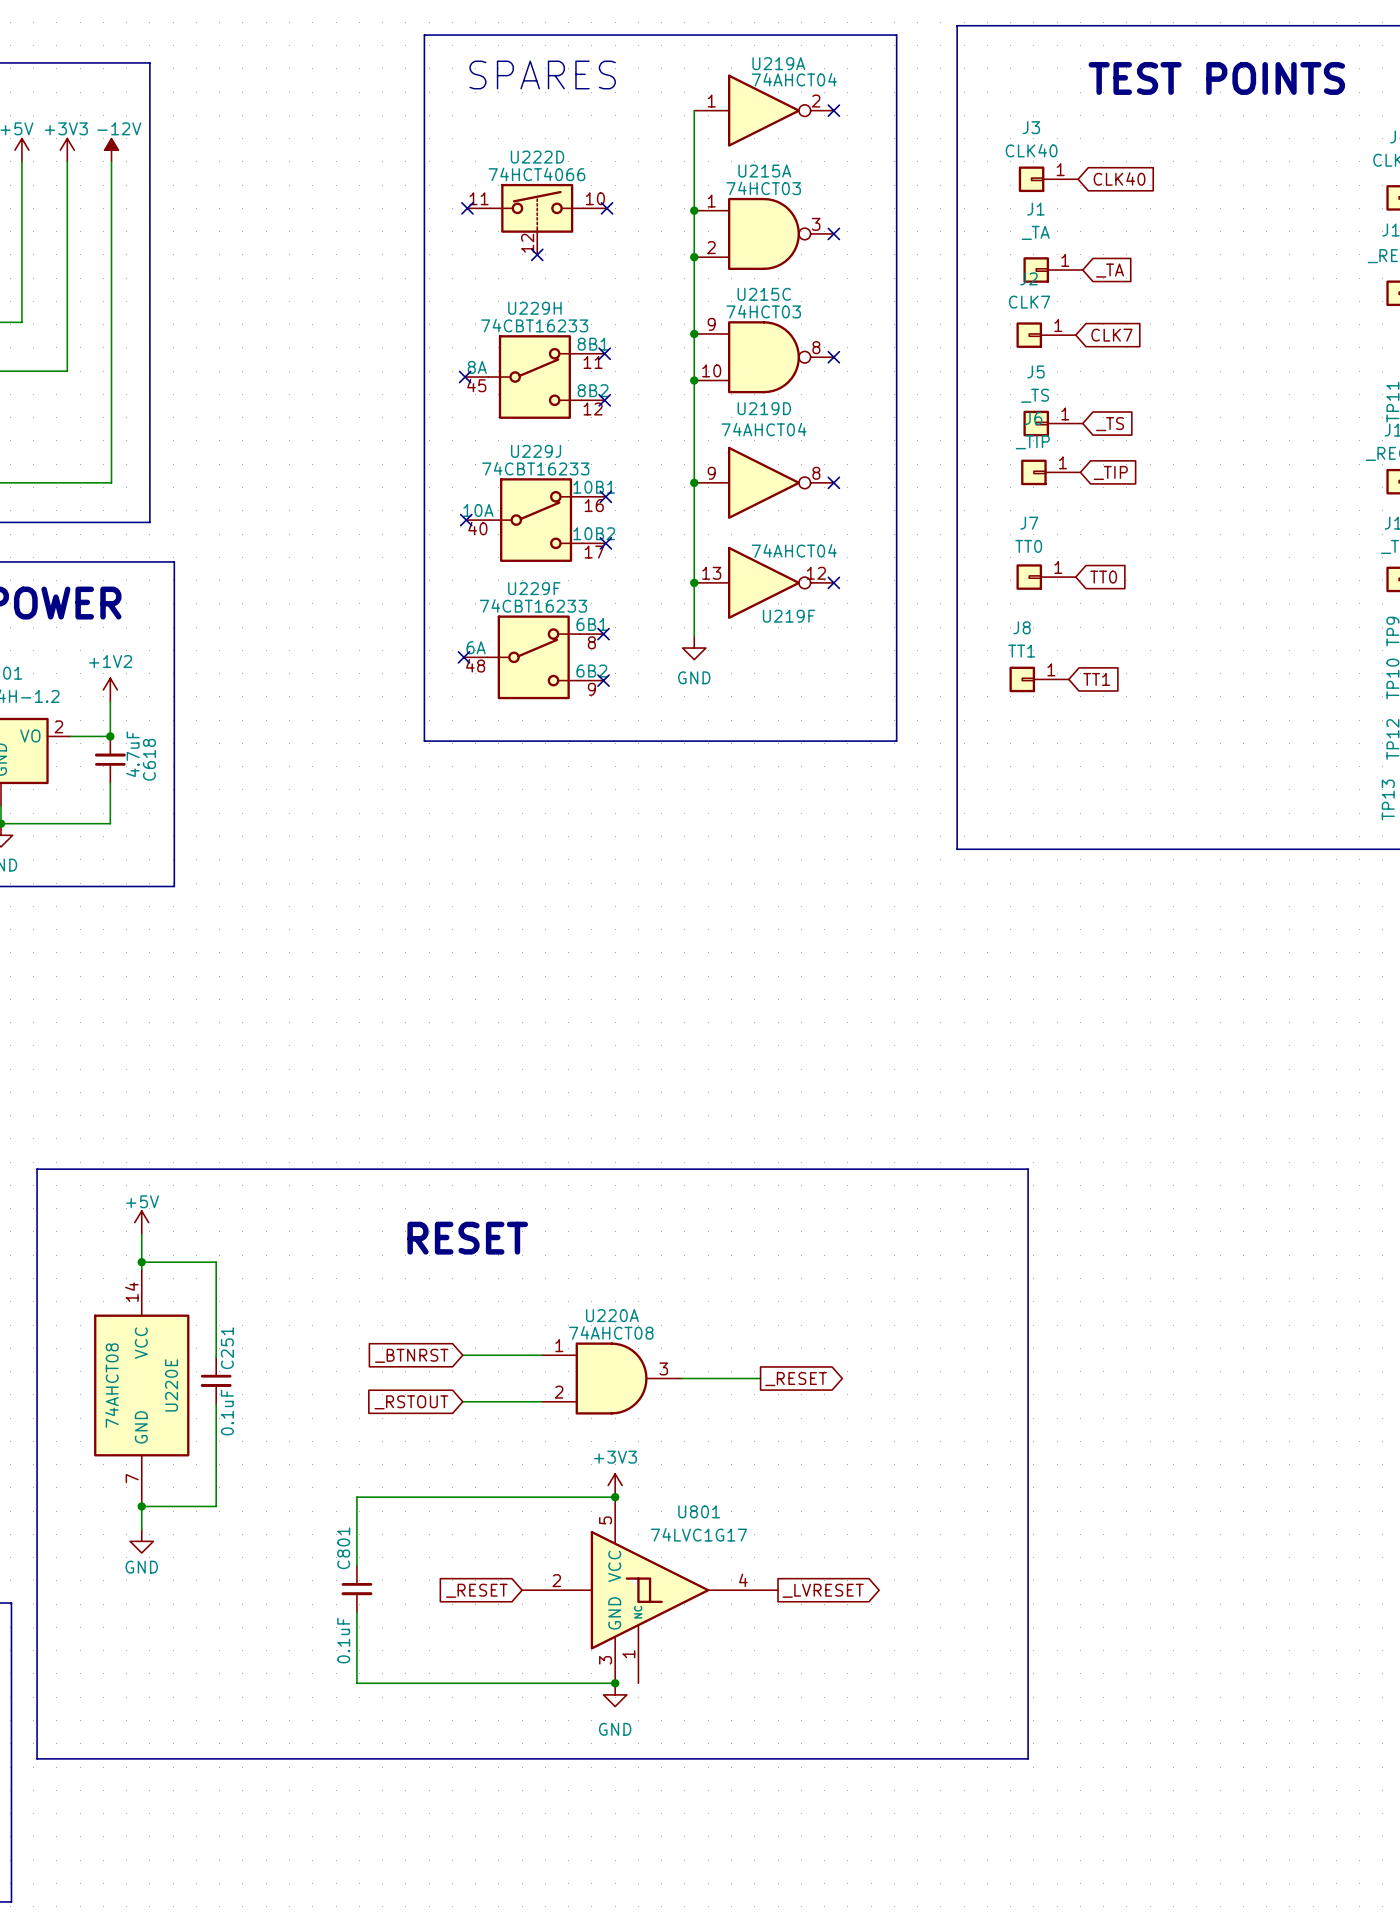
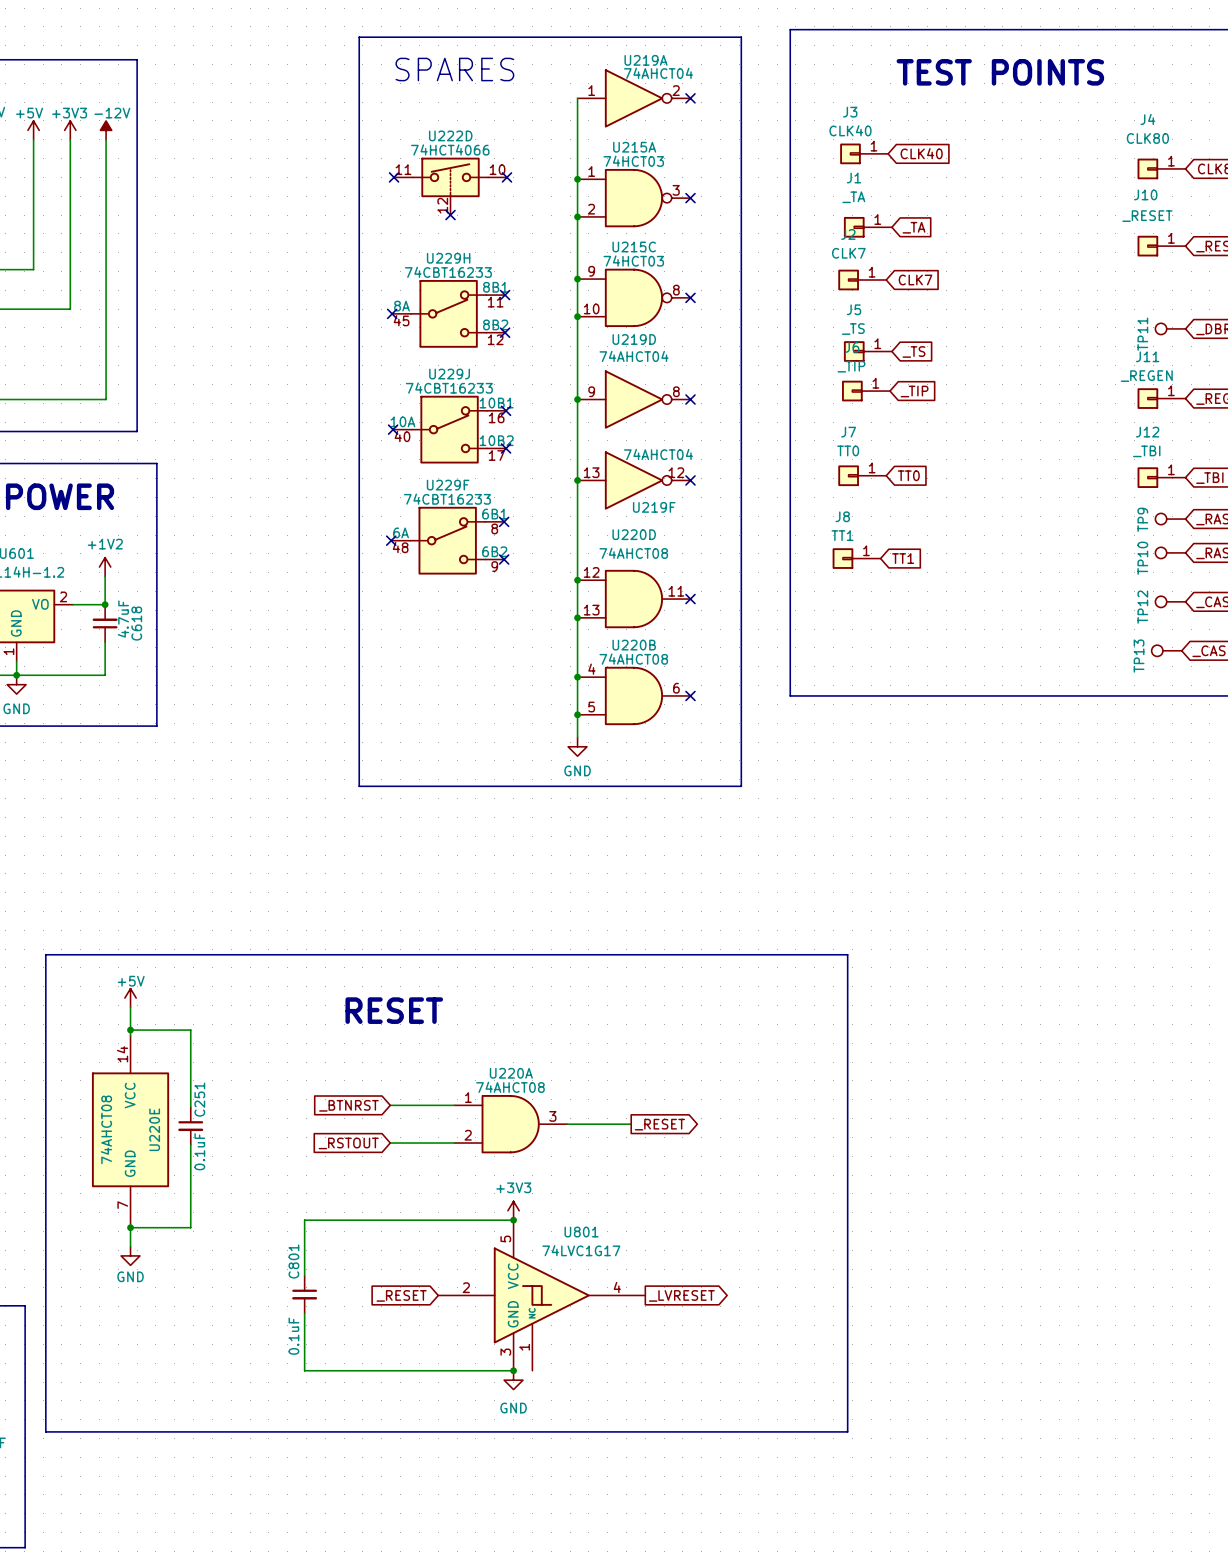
wire: none -> (577, 523) (577, 737)
power symbol: GND (694, 648) -> none
junction: none -> (577, 580)
U220D: none -> 74AHCT08 (634, 599)
no-connect mark: none -> (690, 599)
line: (424, 741) (896, 741) -> (359, 608) (359, 786) (741, 786) (741, 608)
junction: none -> (577, 617)
junction: none -> (577, 677)
U220B: none -> 74AHCT08 (634, 695)
no-connect mark: none -> (690, 695)
junction: none -> (577, 714)
power symbol: none -> GND (577, 746)

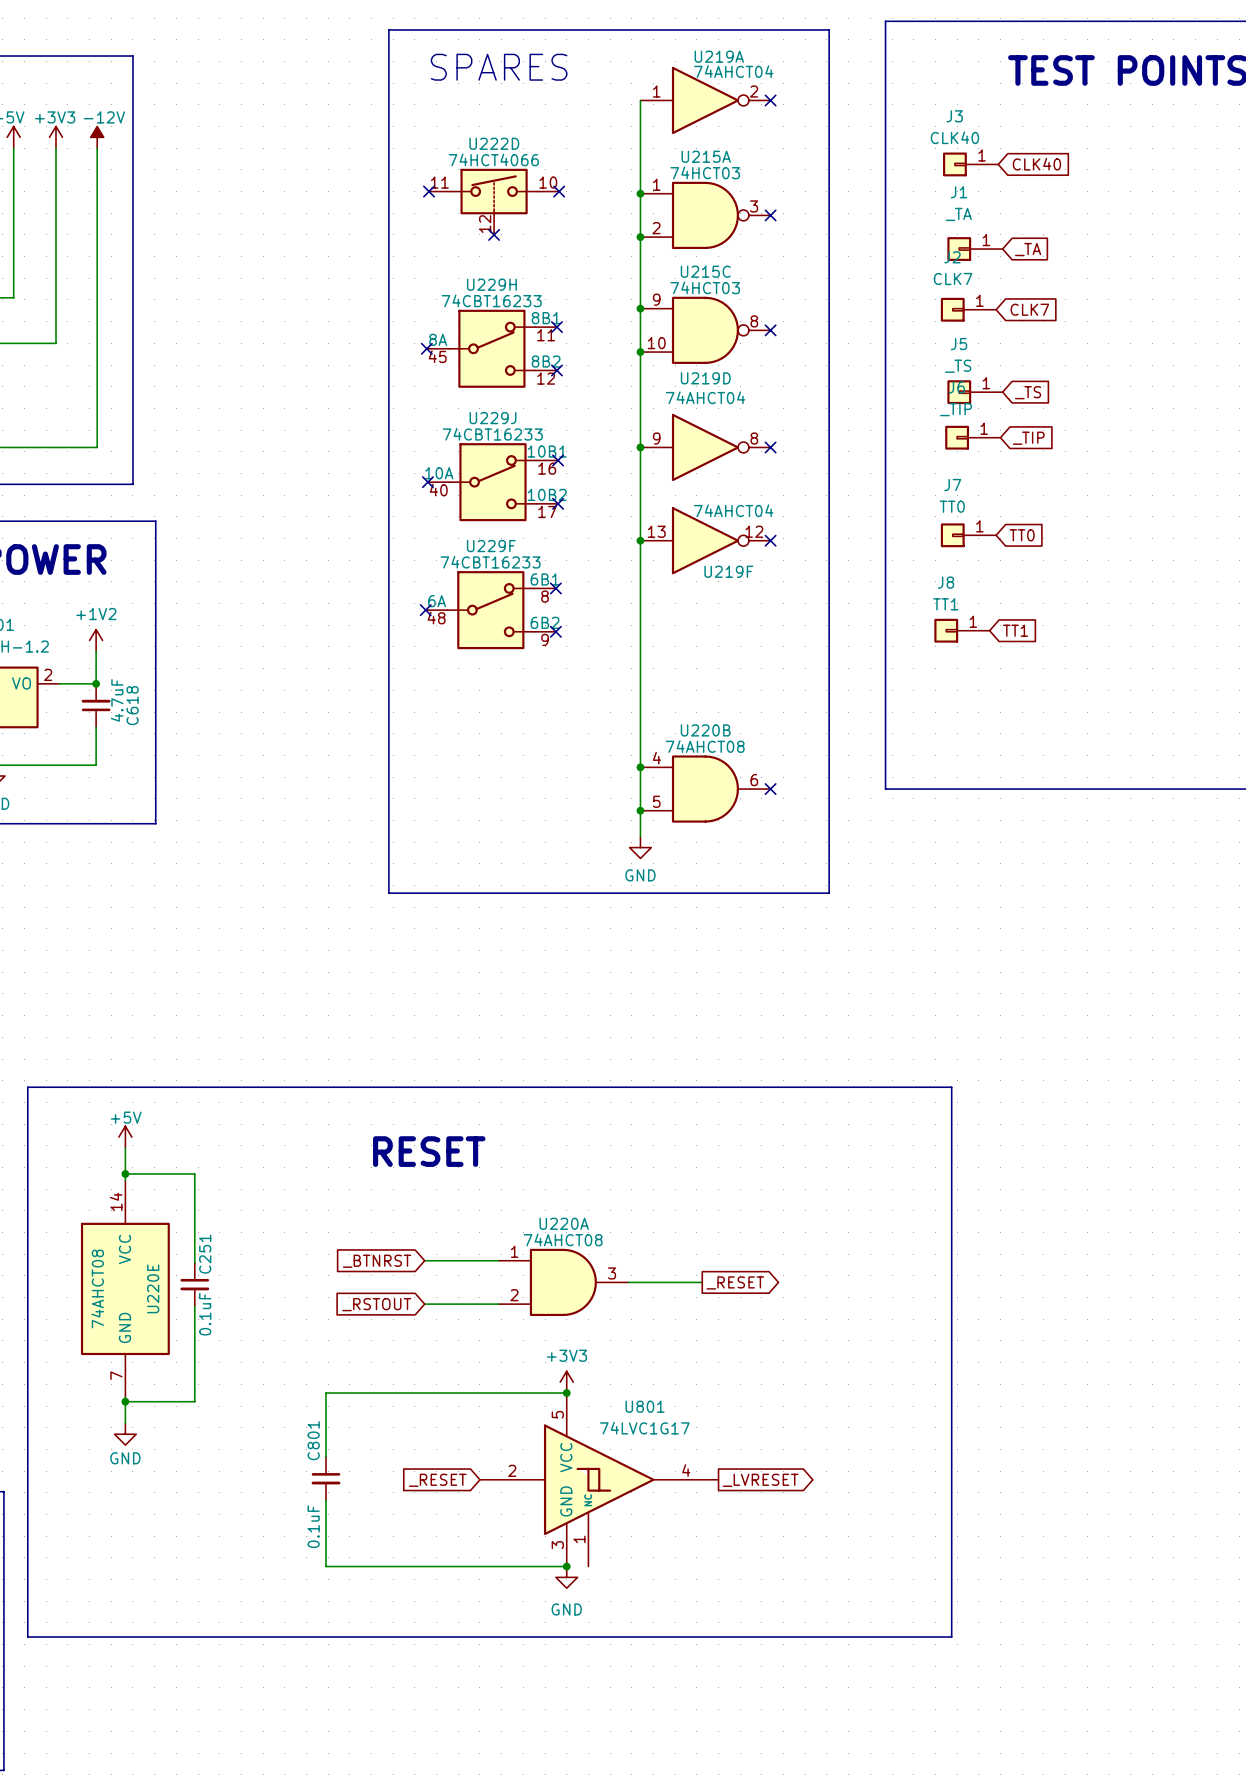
junction: (577, 580) -> none
U220D: 74AHCT08 (634, 599) -> none
no-connect mark: (690, 599) -> none
junction: (577, 617) -> none

